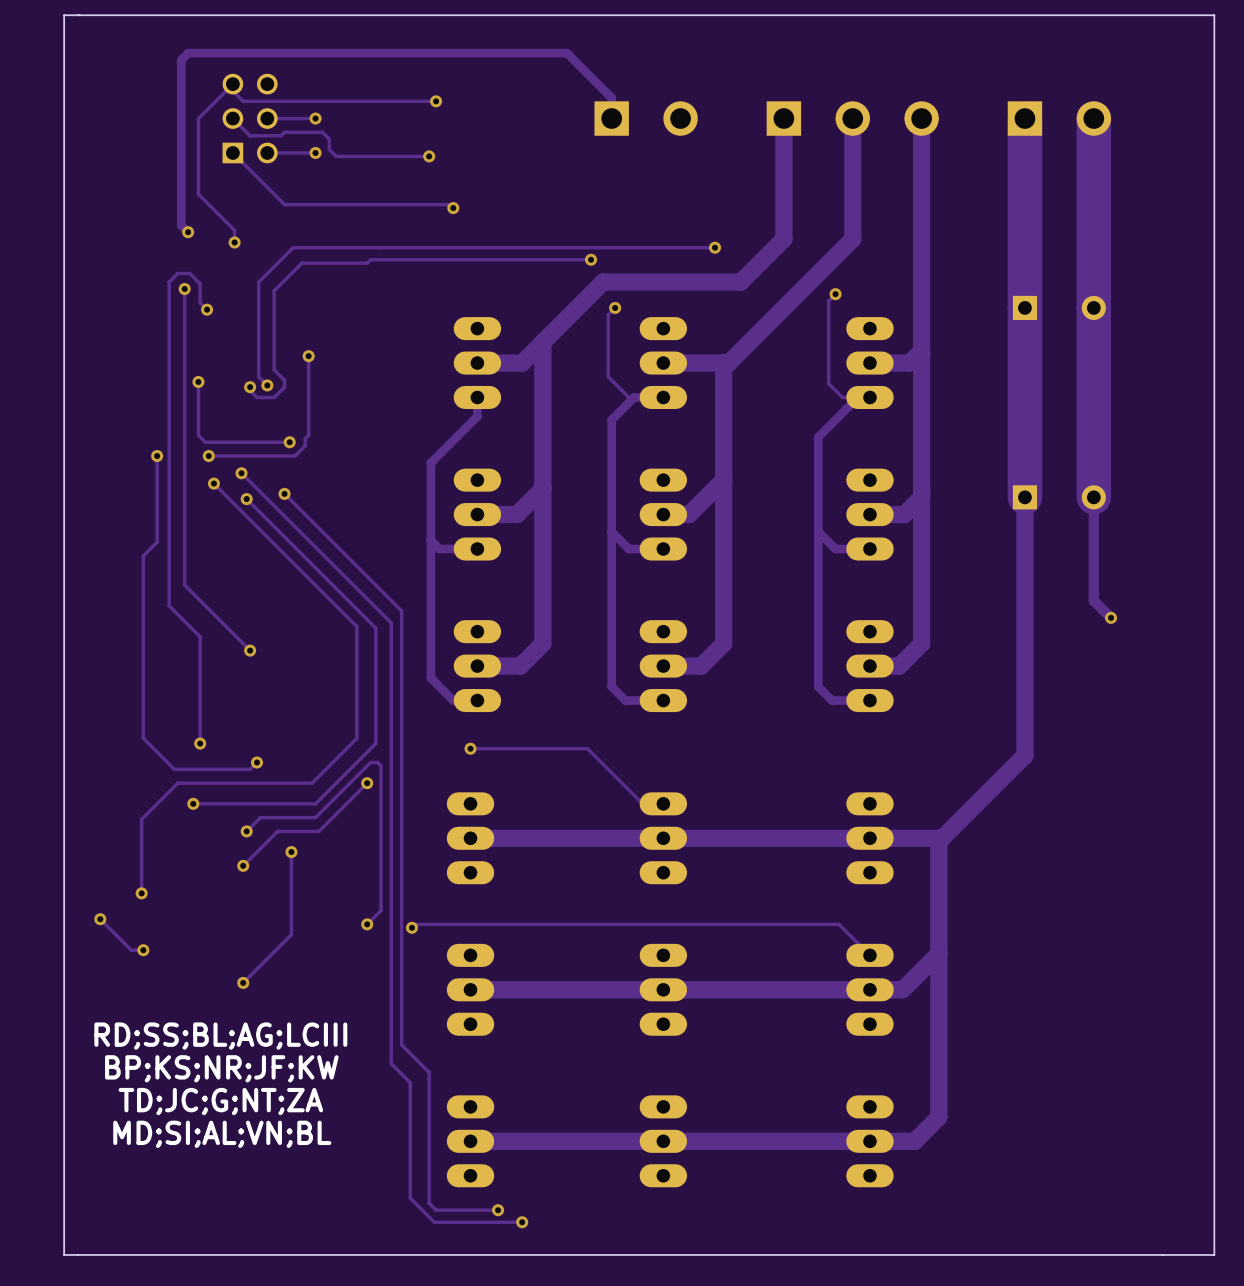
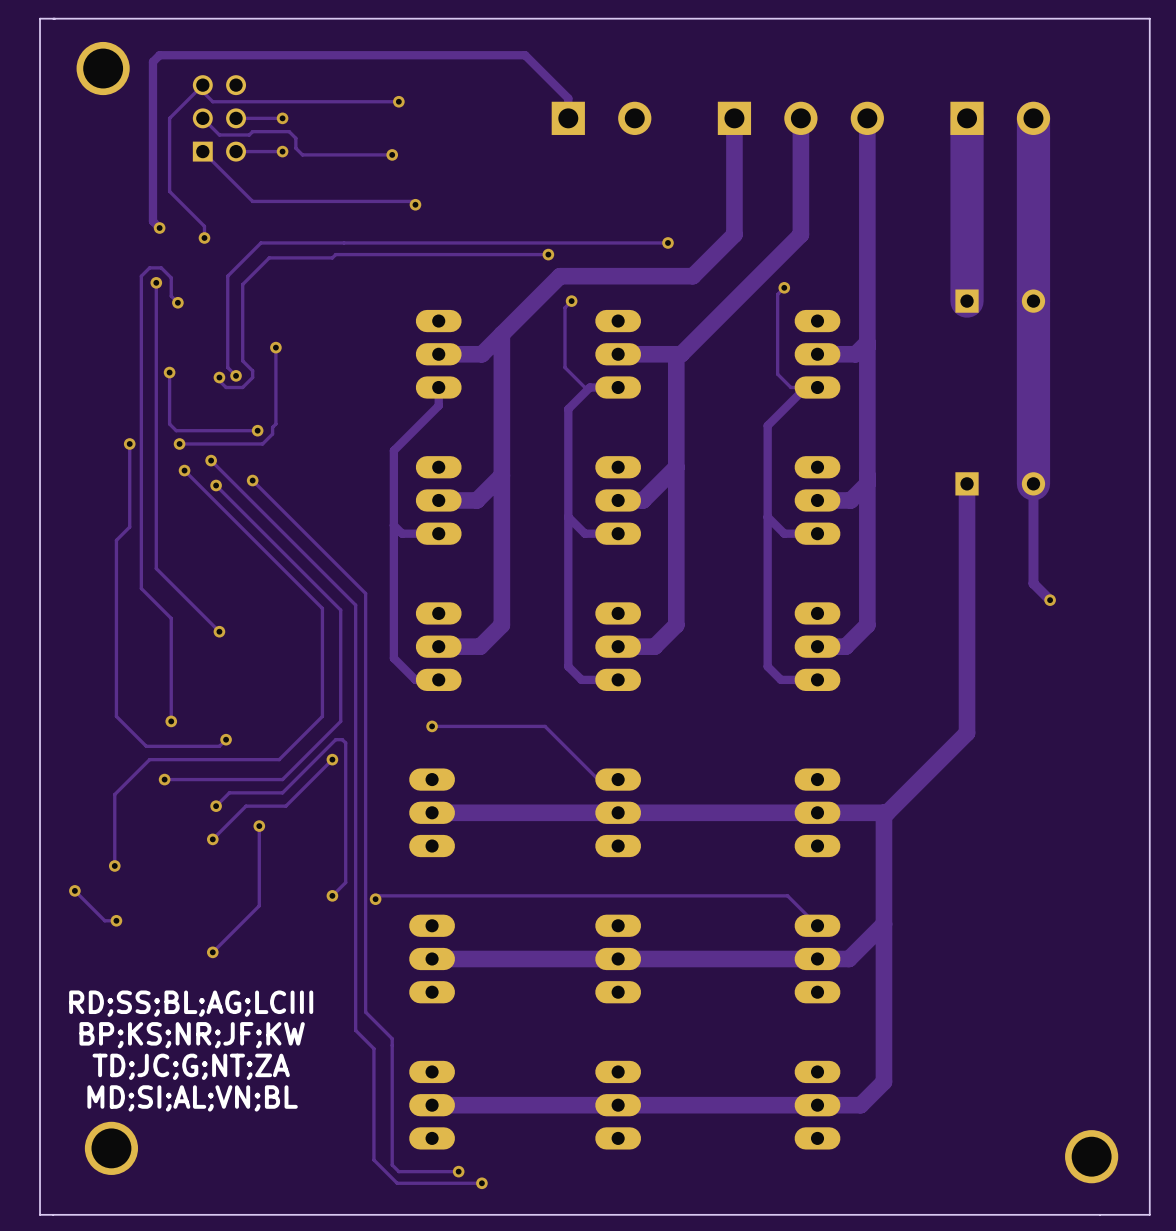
part: none -> (103, 68)
track: (1024, 307) (1024, 497) -> none
part: none -> (111, 1148)
part: none -> (1091, 1156)

